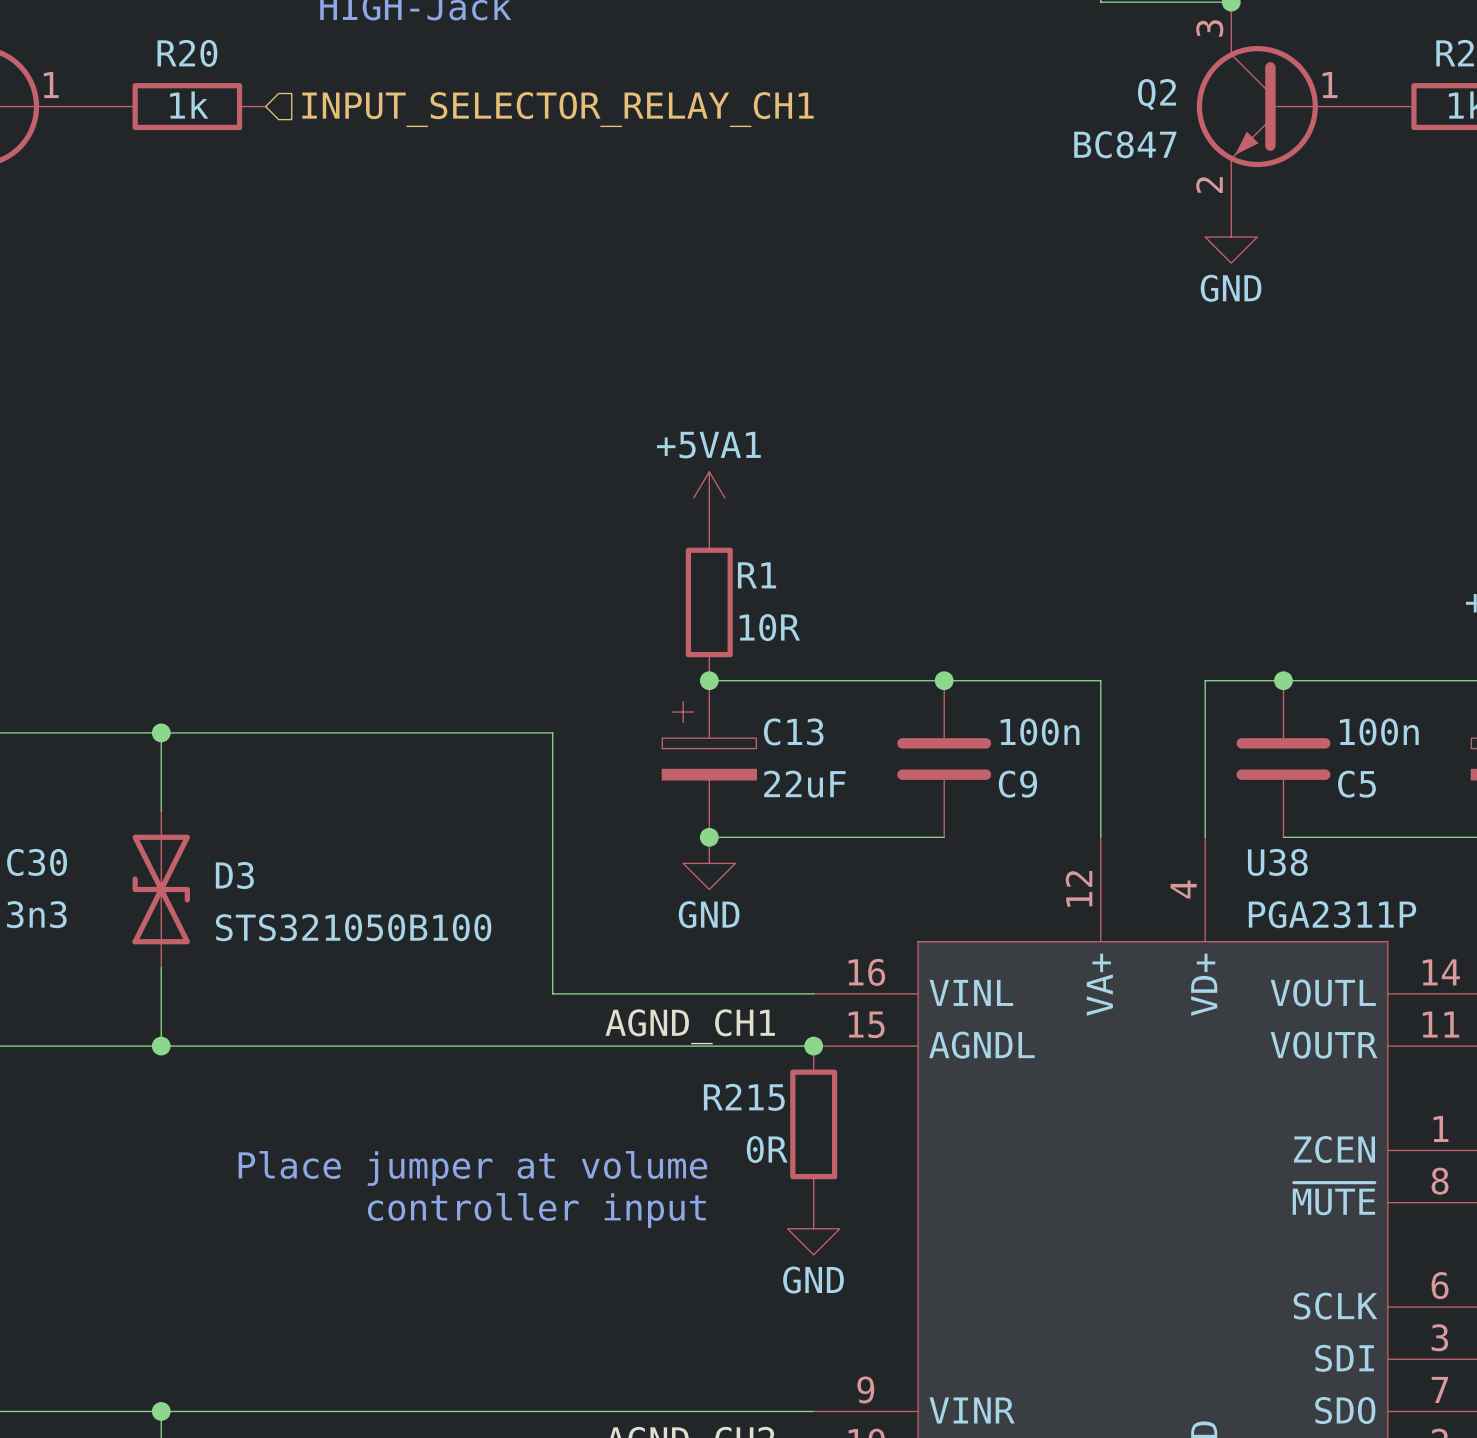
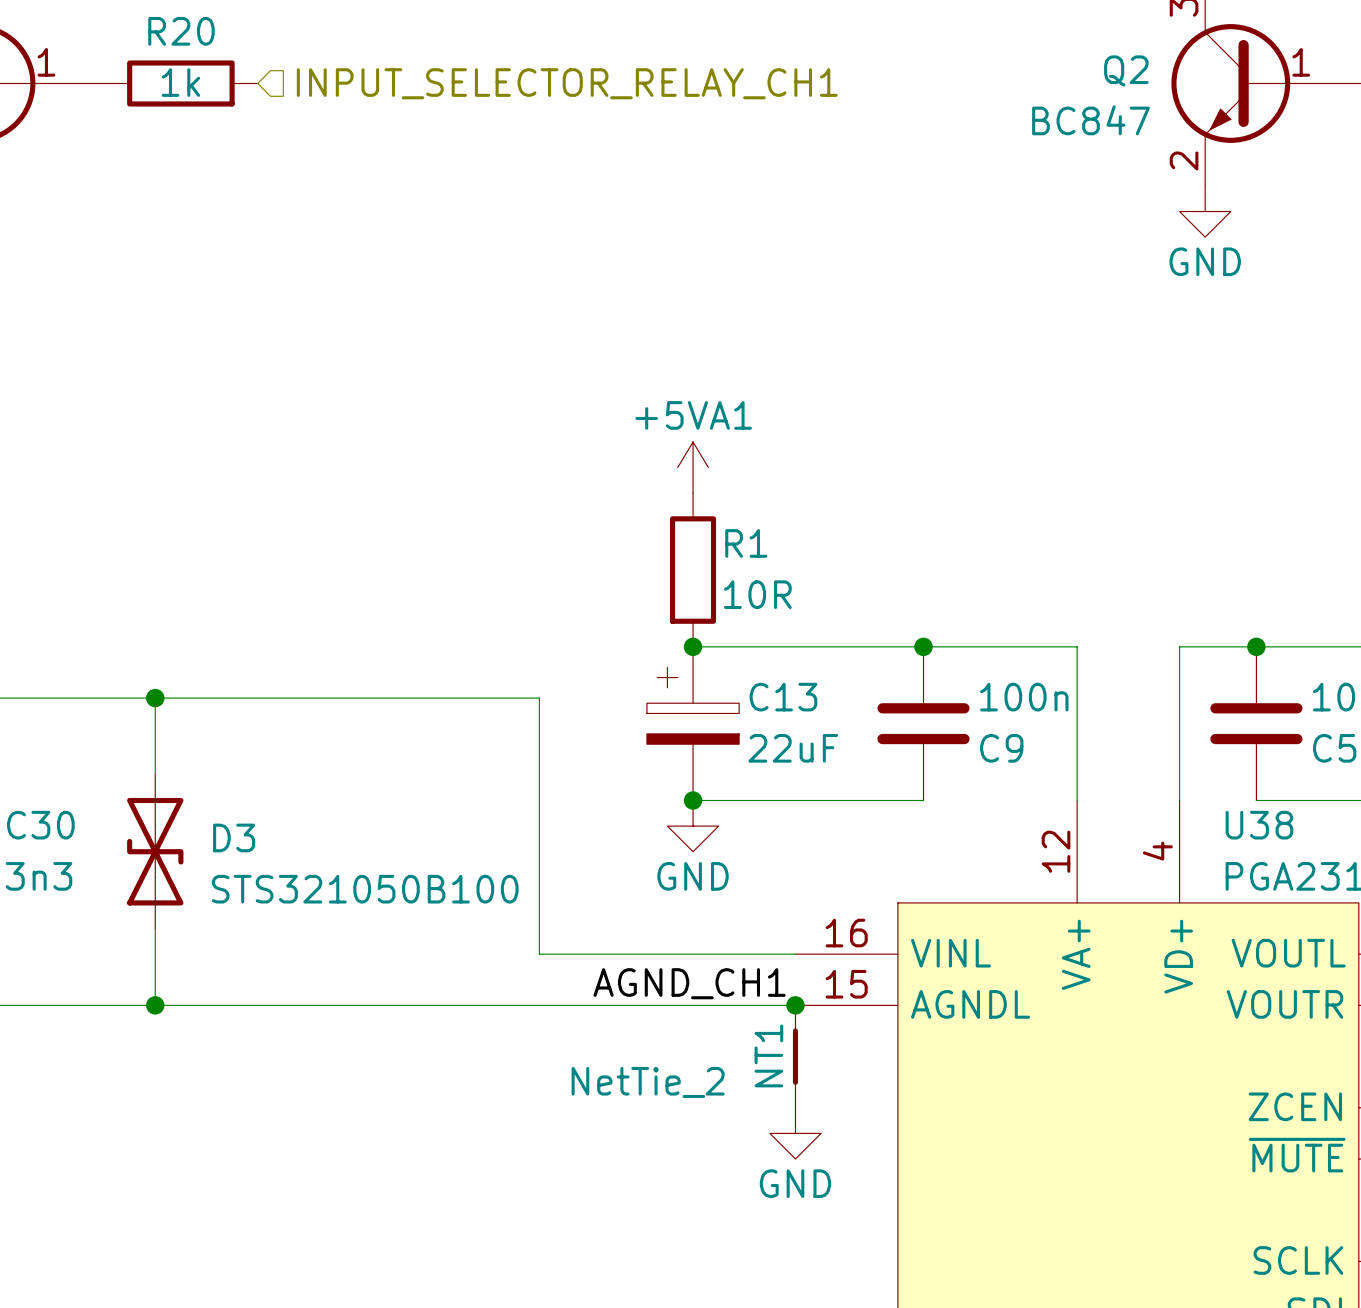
NT1: none -> NetTie_2 (795, 1056)
R215: 0R (813, 1124) -> none
text: Place jumper at volume (472, 1168) -> none
text: controller input (536, 1210) -> none
power symbol position: GND (813, 1228) -> GND (795, 1133)

